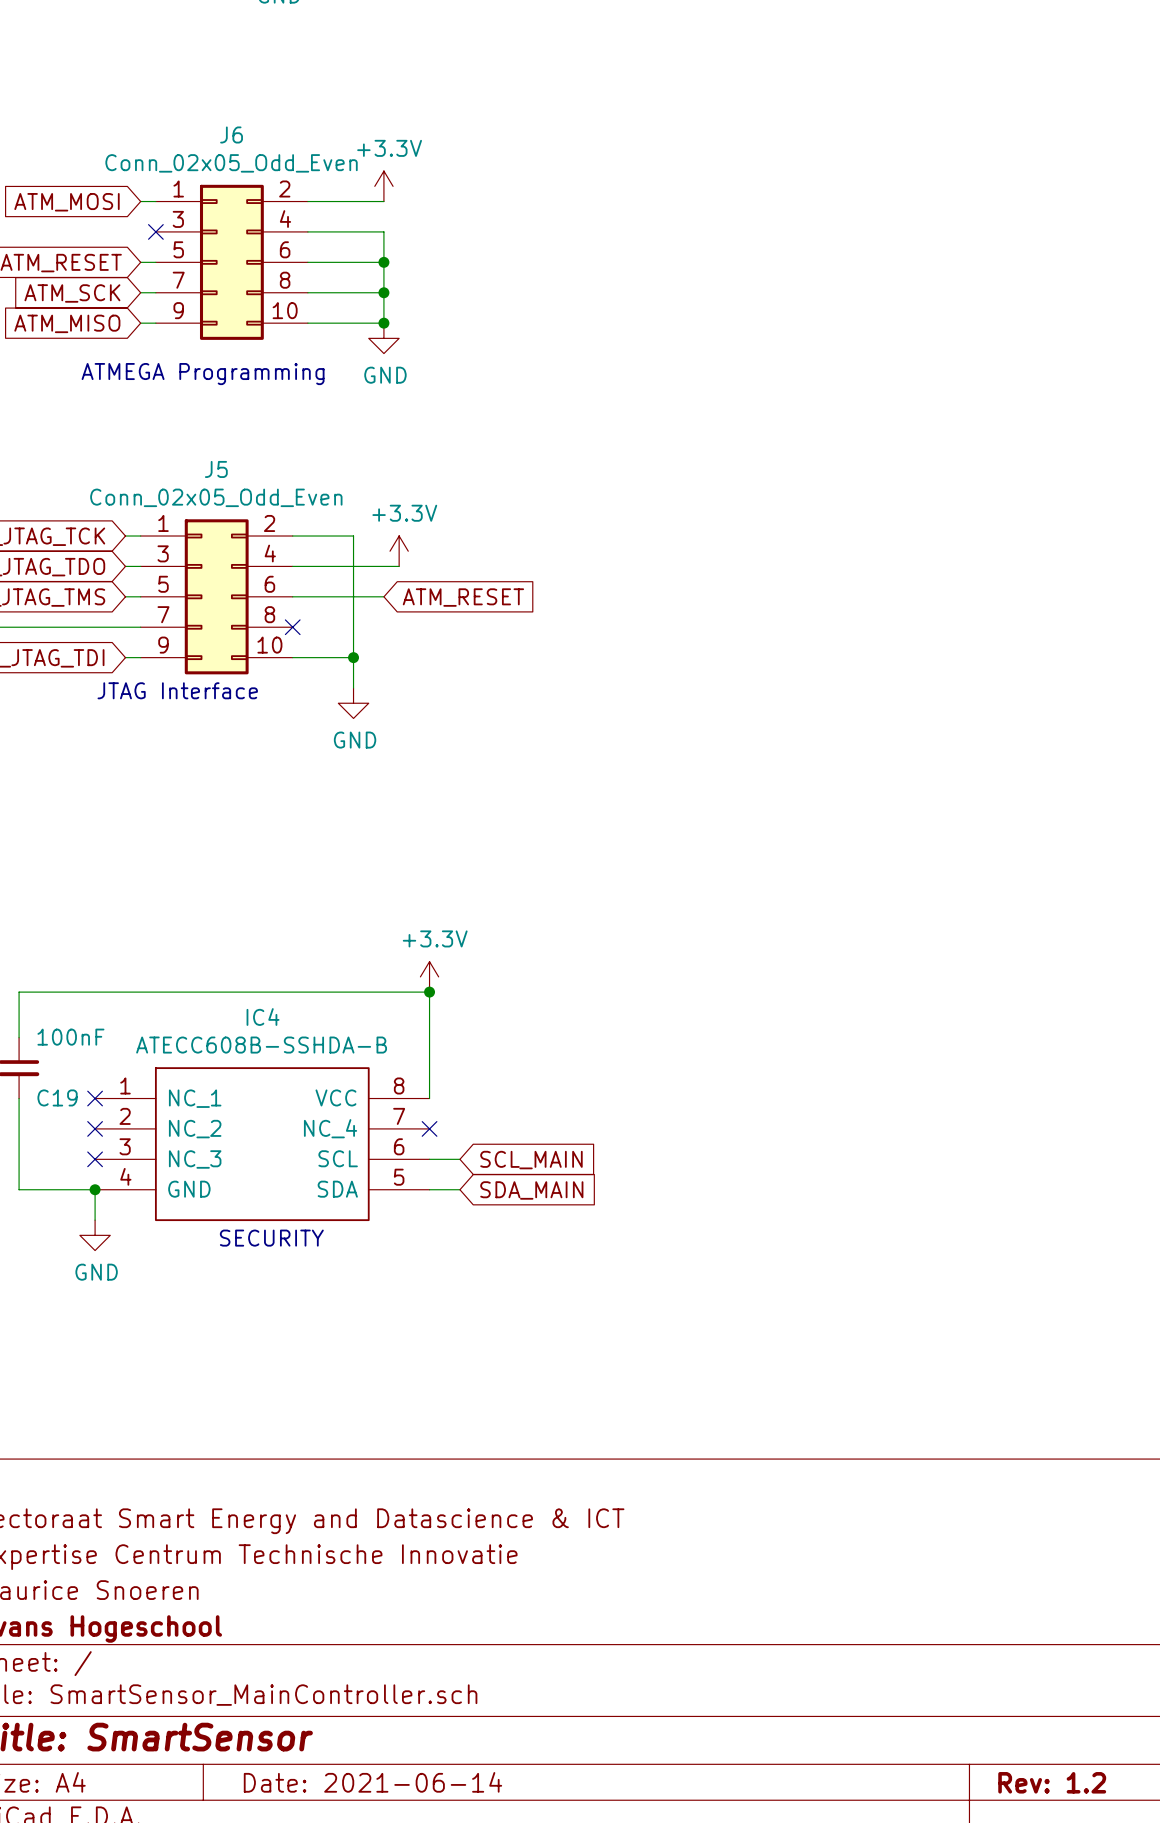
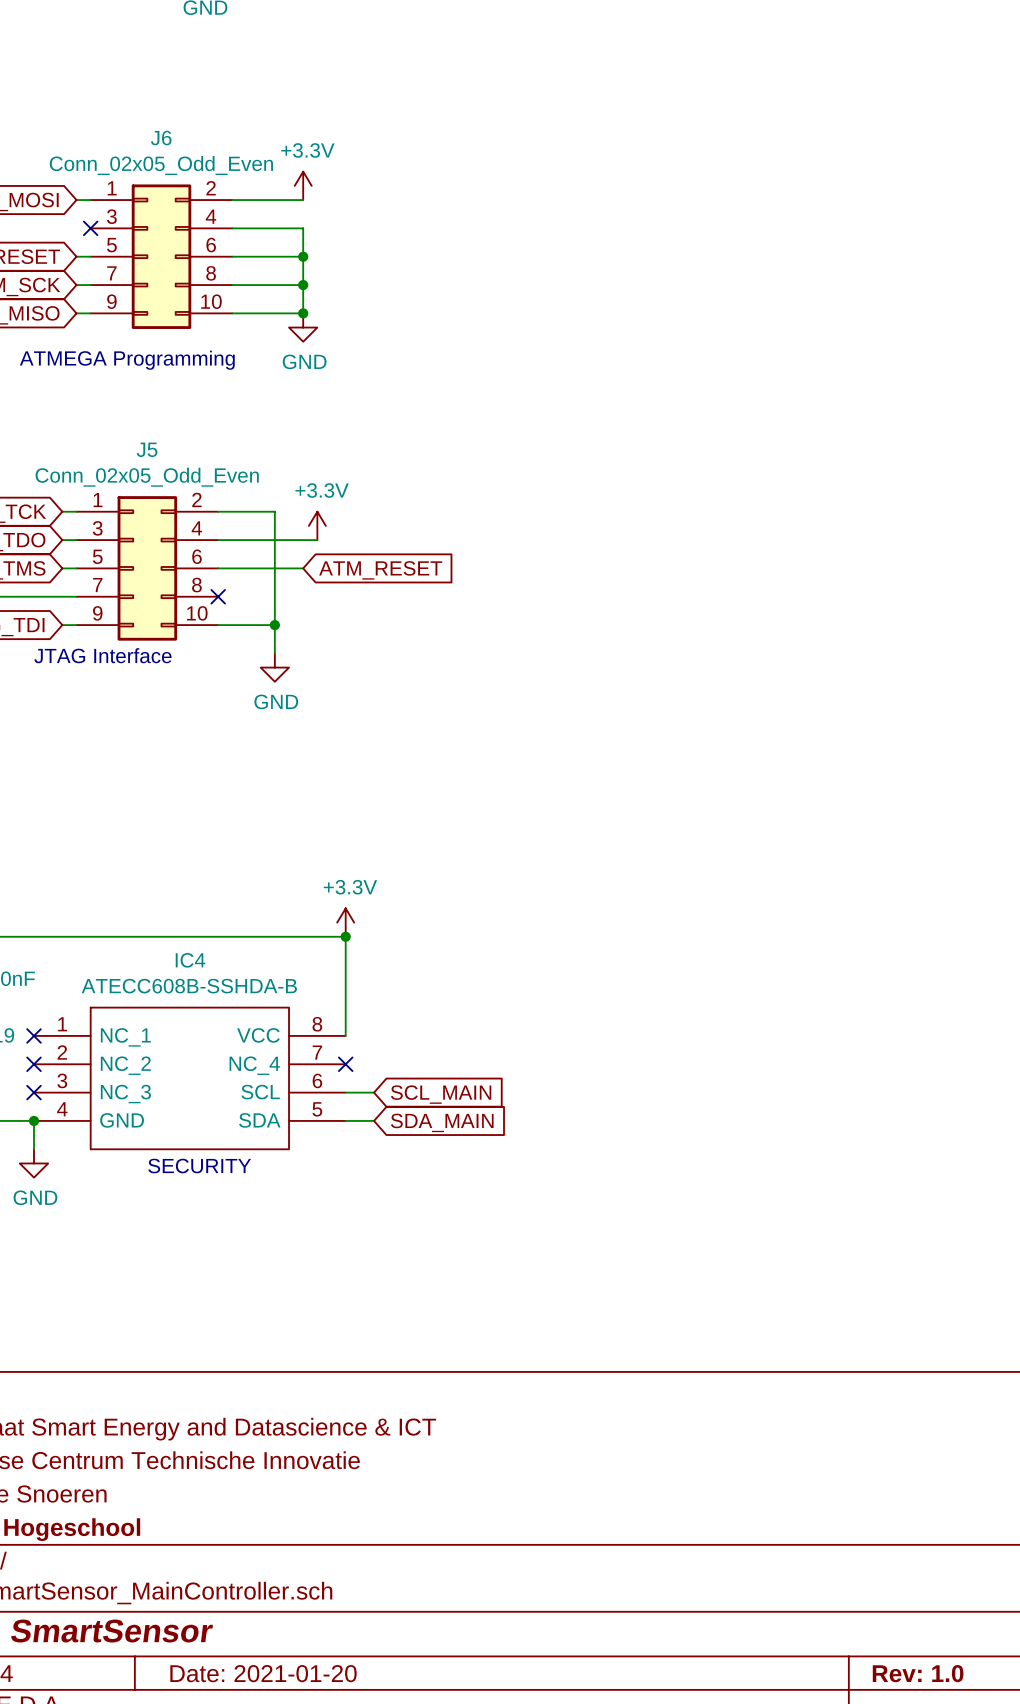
title block: Date: 2021-06-14 (372, 1782) -> Date: 2021-01-20 (263, 1673)
title block: Rev: 1.2 (1052, 1782) -> Rev: 1.0 (918, 1673)

